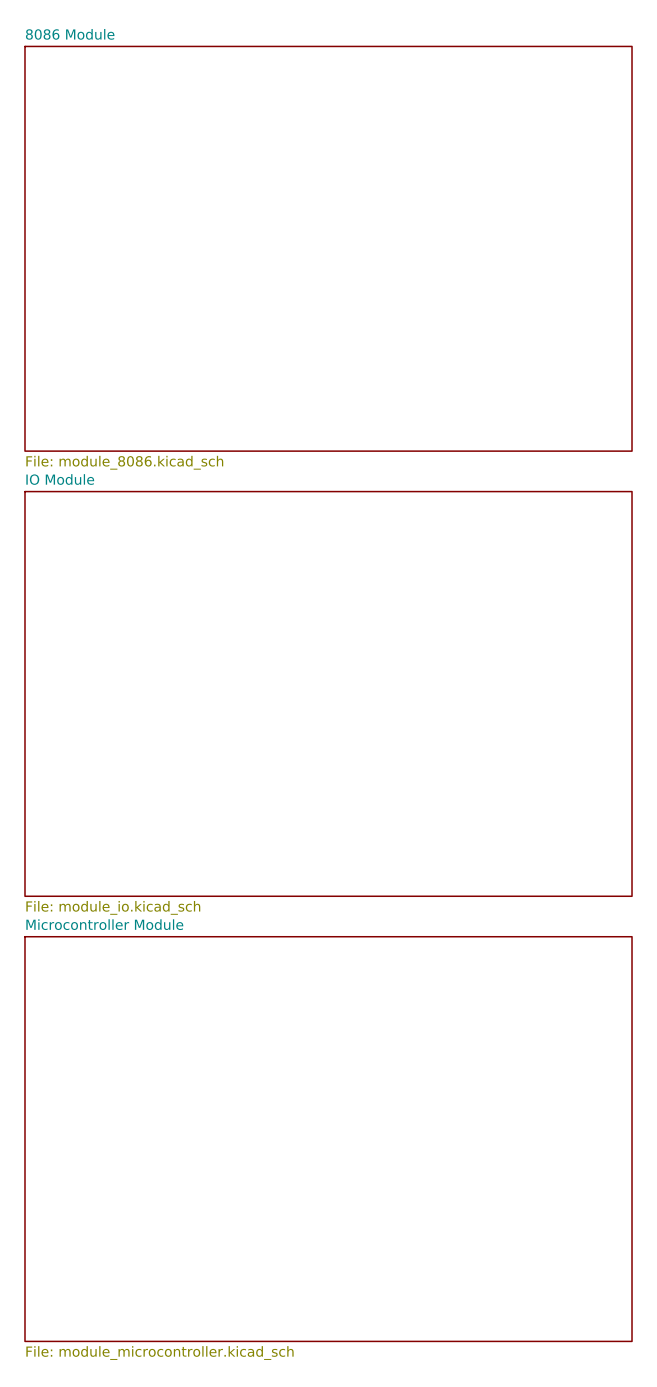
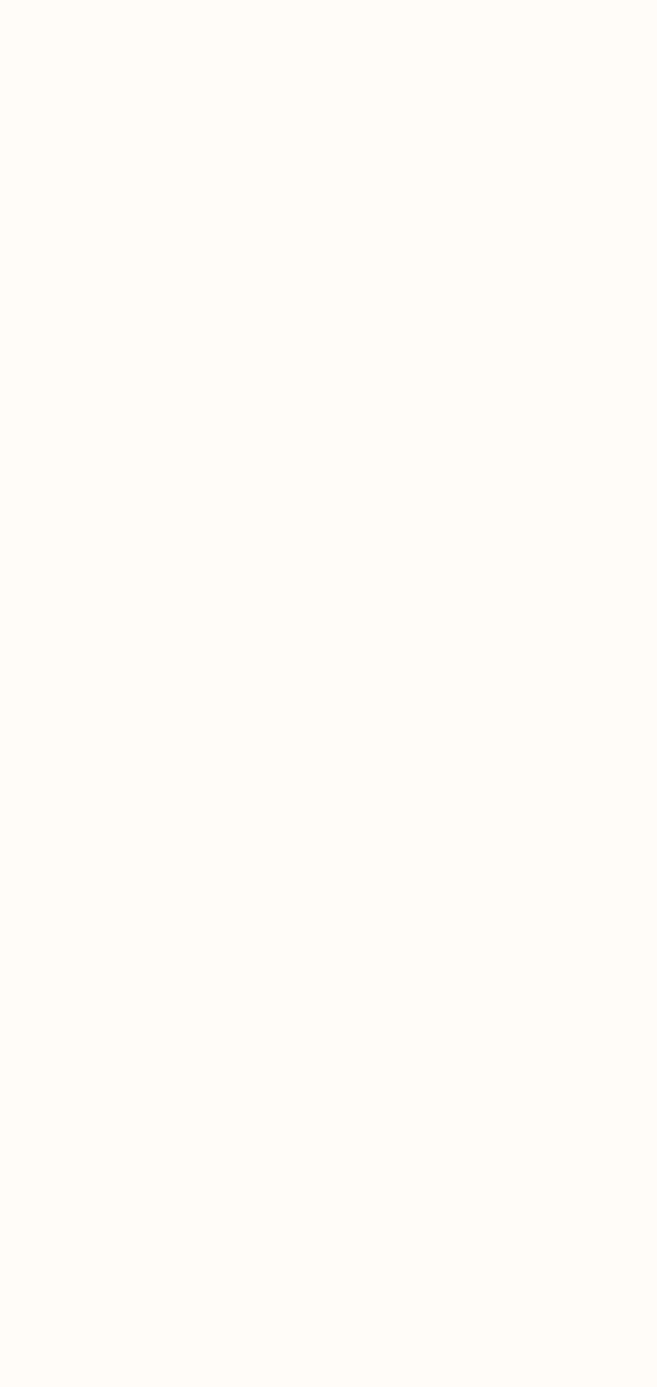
sheet 8086 Module: File: module_8086.kicad_sch (328, 248) -> none
sheet IO Module: File: module_io.kicad_sch (328, 693) -> none
sheet Microcontroller Module: File: module_microcontroller.kicad_sch (328, 1139) -> none

